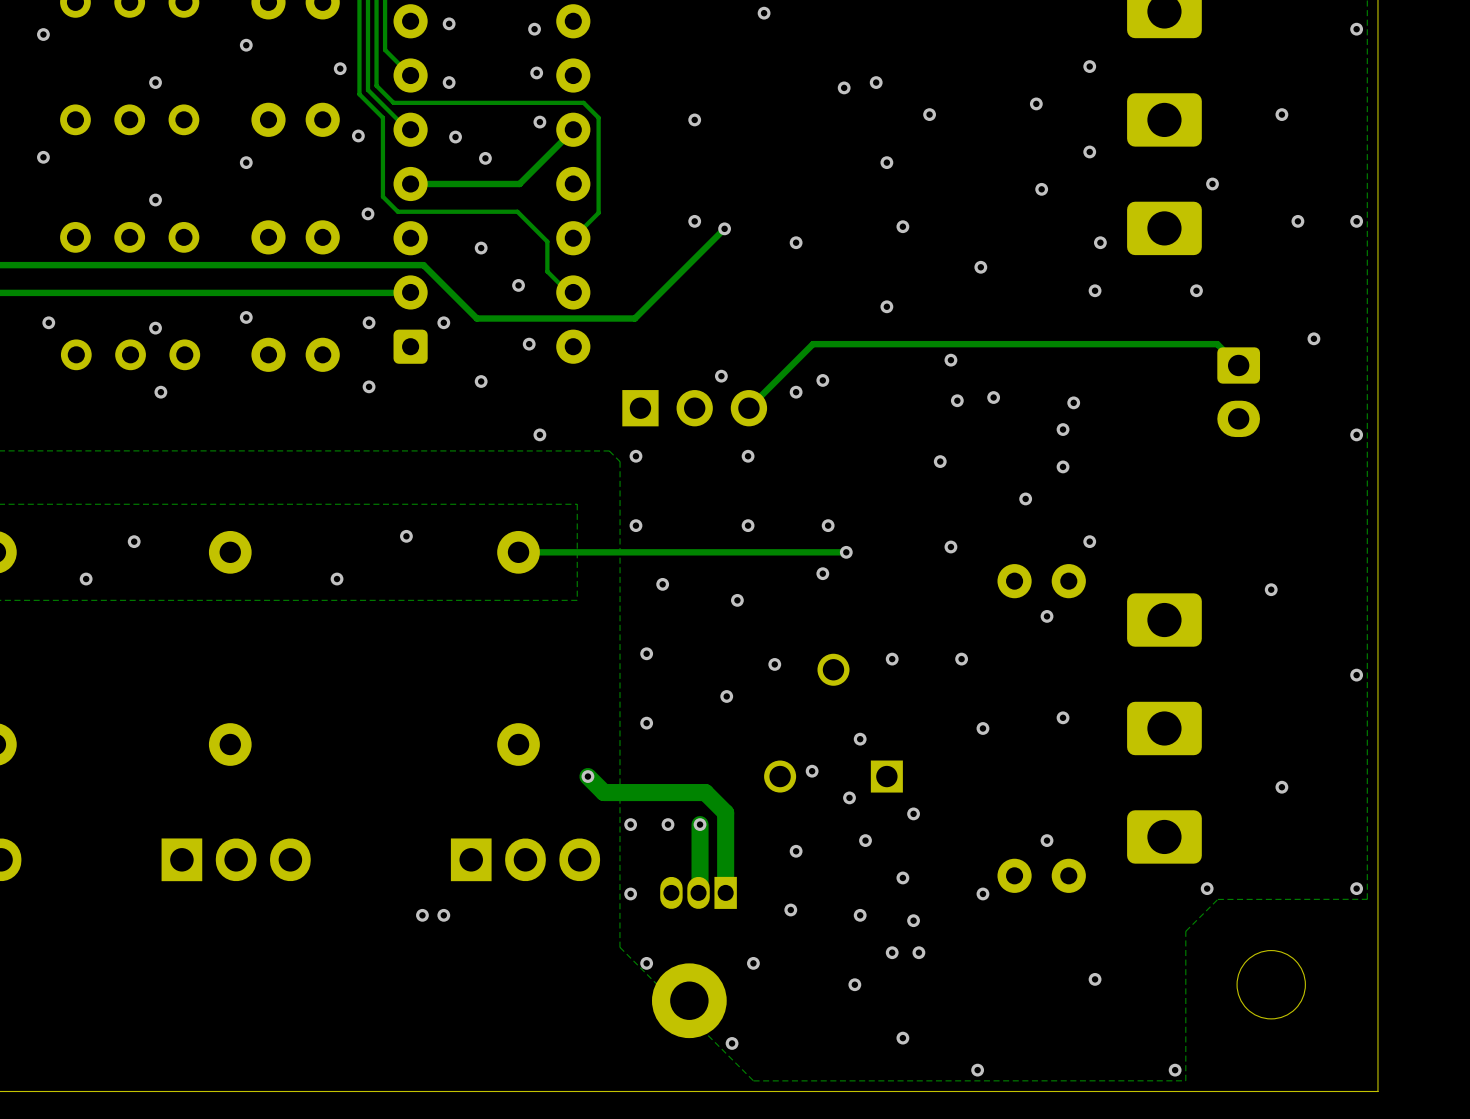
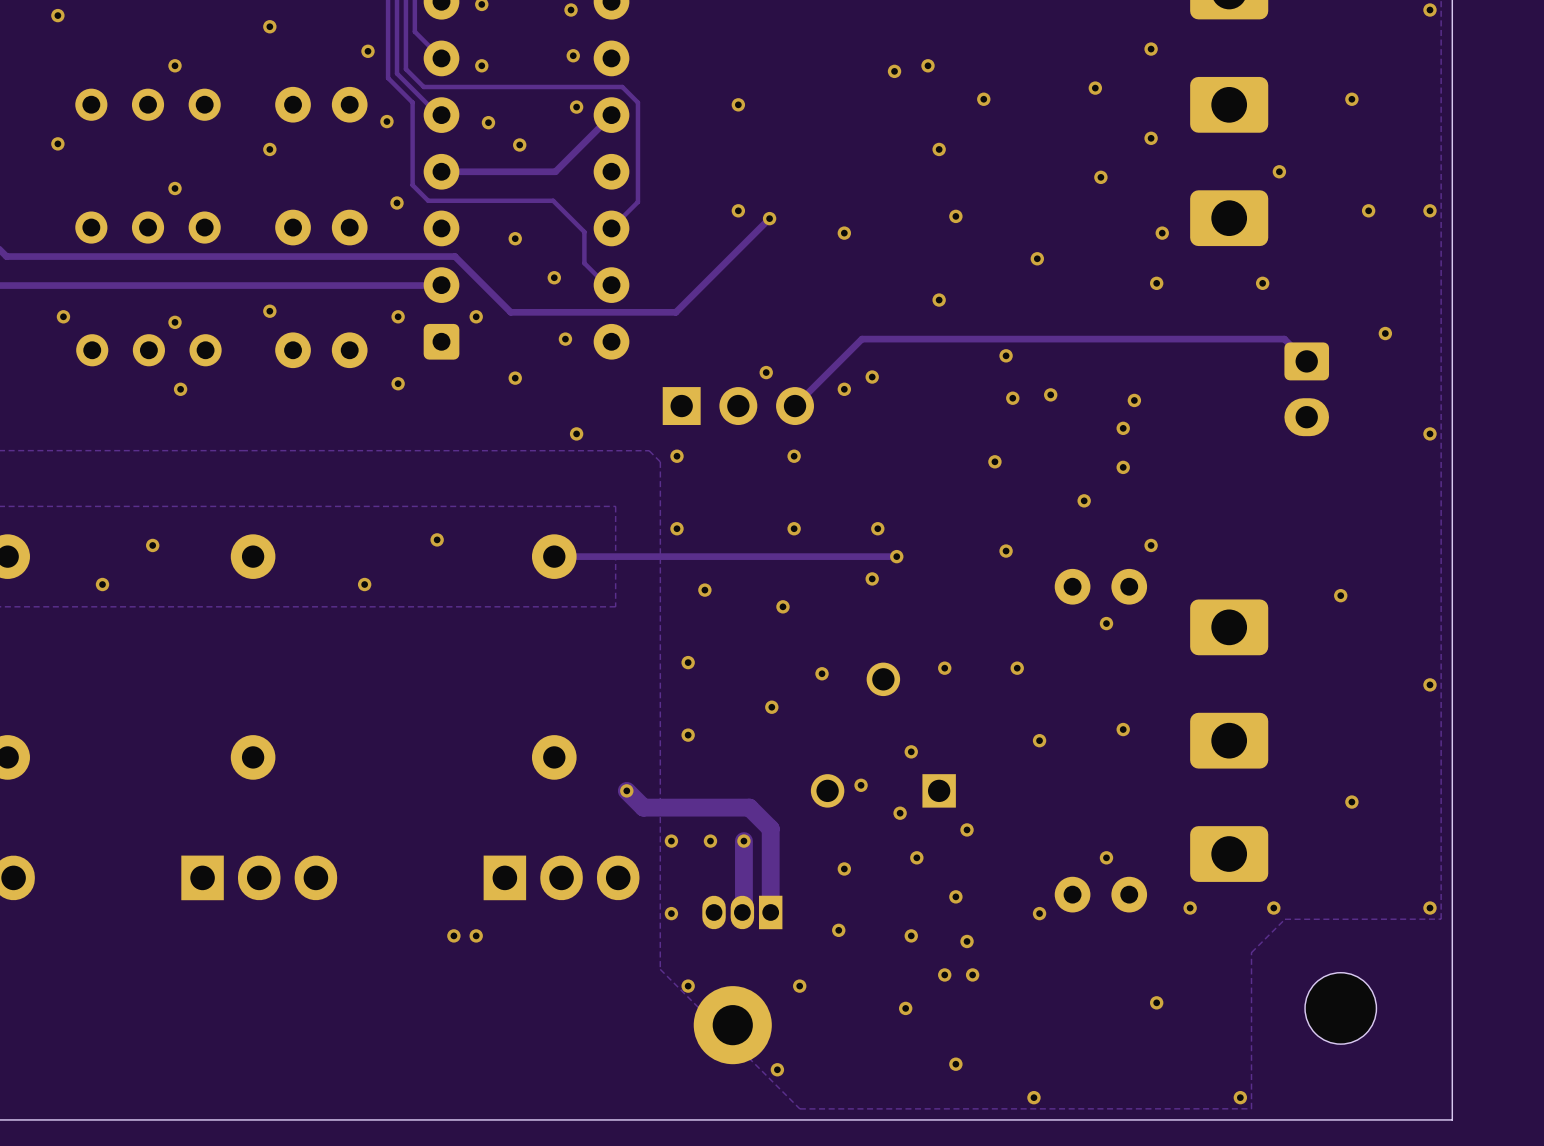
via: none -> (1190, 908)

